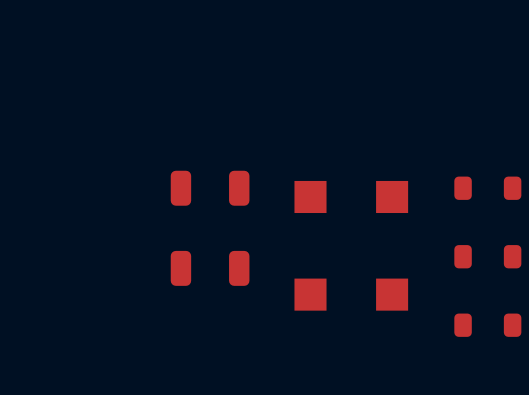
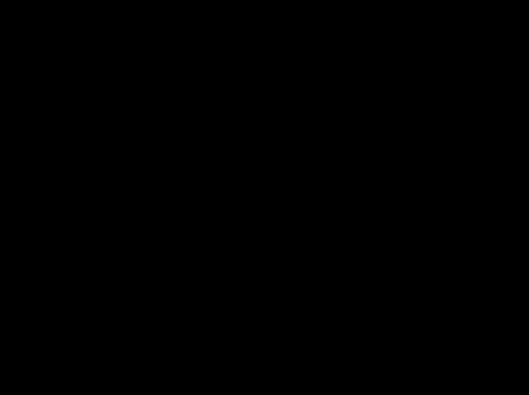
part: (210, 188) -> none
part: (487, 188) -> none
part: (351, 196) -> none
part: (487, 256) -> none
part: (210, 268) -> none
part: (351, 294) -> none
part: (487, 325) -> none

